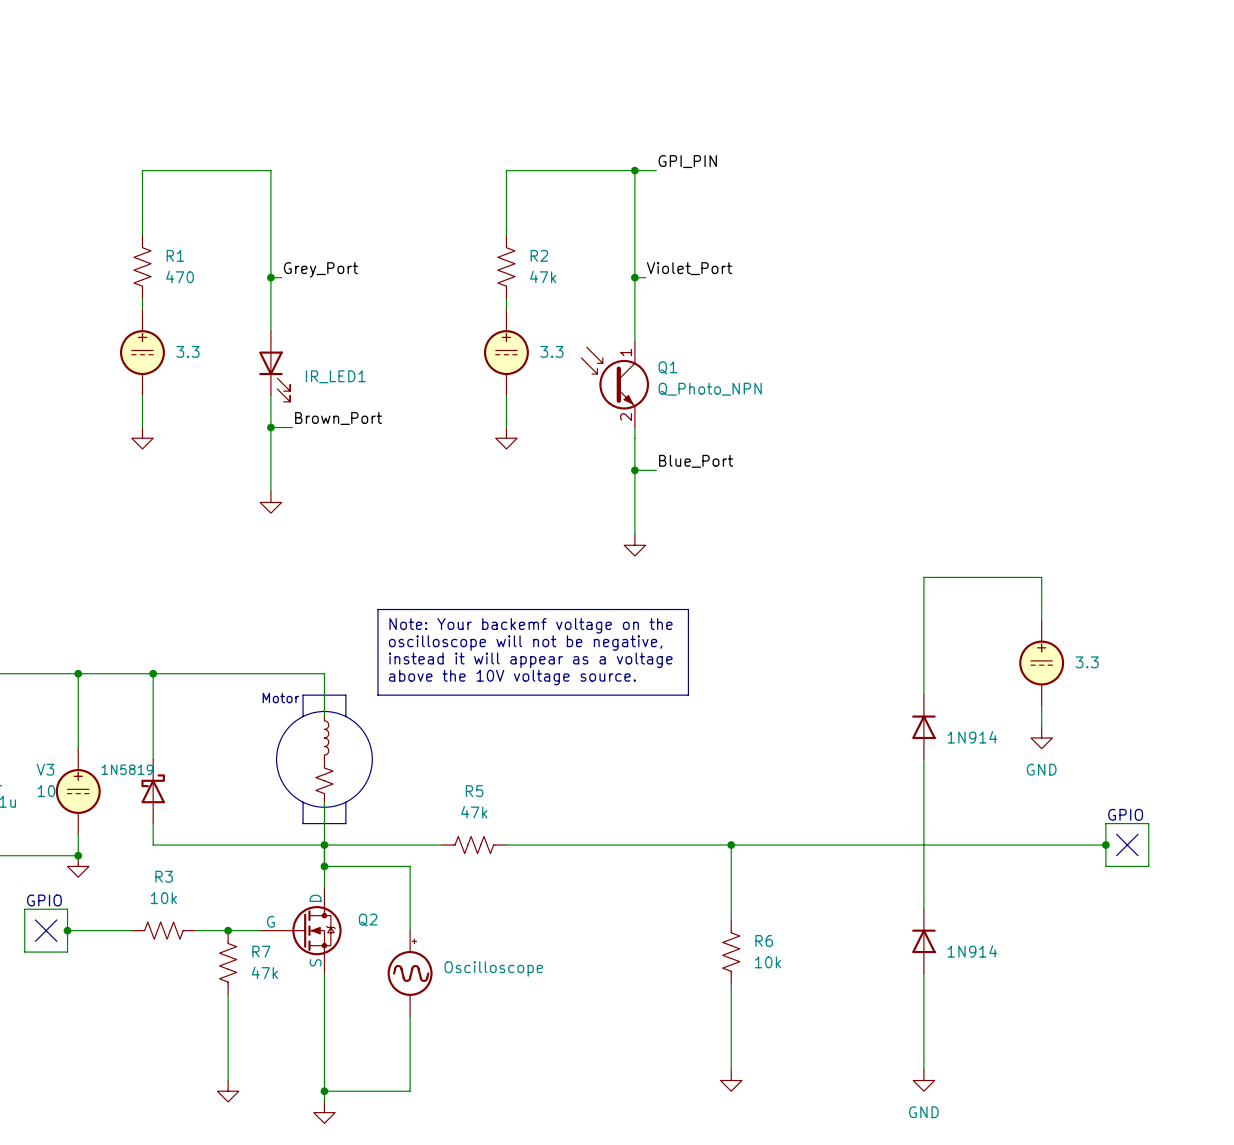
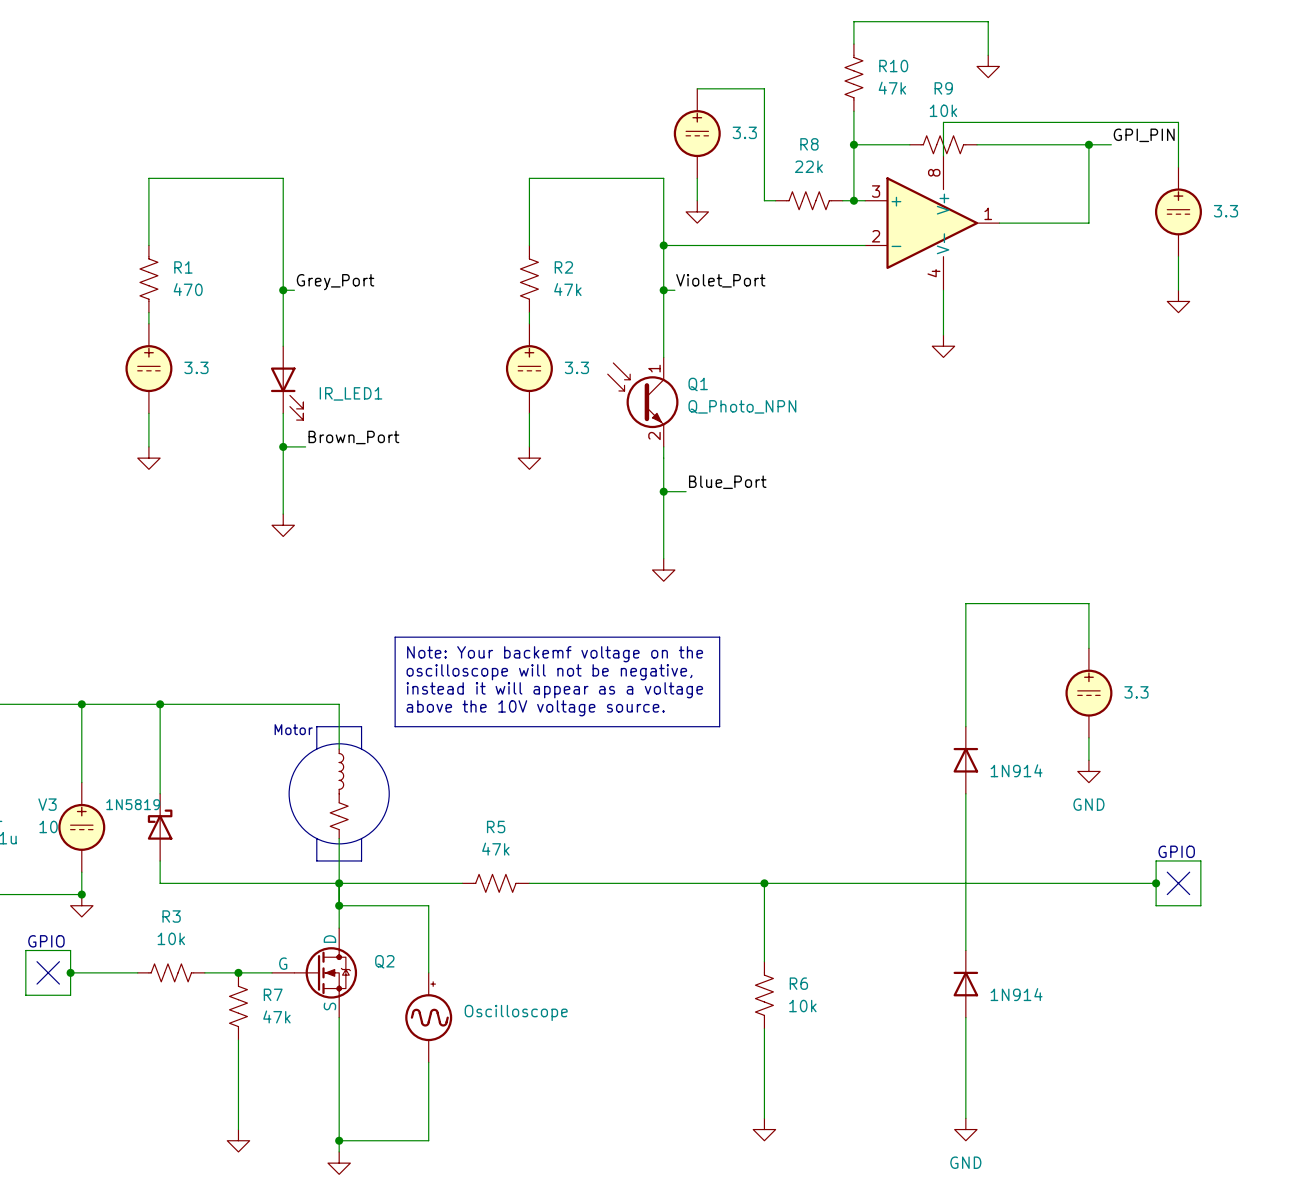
wire: none -> (853, 44) (853, 21) (988, 21) (988, 55)
power symbol: none -> (988, 66)
R10: none -> 47k (853, 77)
wire: none -> (697, 88) (764, 88) (764, 200) (775, 200)
wire: none -> (853, 111) (853, 200)
part: none -> 3.3 (697, 133)
label: none -> GPI_PIN (1144, 135)
wire: none -> (853, 144) (909, 144)
junction: none -> (853, 144)
R9: none -> 10k (943, 144)
wire: none -> (977, 144) (1111, 144)
wire: none -> (1088, 144) (1088, 223) (999, 223)
junction: none -> (1088, 144)
wire: none -> (943, 155) (943, 122) (1178, 122) (1178, 167)
label: GPI_PIN (687, 161) -> none
wire: (634, 170) (656, 170) -> (842, 200) (865, 200)
junction: (634, 170) -> none
wire: none -> (697, 178) (697, 200)
R8: none -> 22k (809, 200)
junction: none -> (853, 200)
power symbol: none -> (697, 211)
part: none -> 3.3 (1178, 211)
part: none -> (932, 223)
part: none -> (943, 223)
wire: none -> (663, 245) (865, 245)
junction: none -> (663, 245)
wire: none -> (1178, 256) (1178, 290)
wire: none -> (943, 290) (943, 335)
power symbol: none -> (1178, 301)
power symbol: none -> (943, 346)

